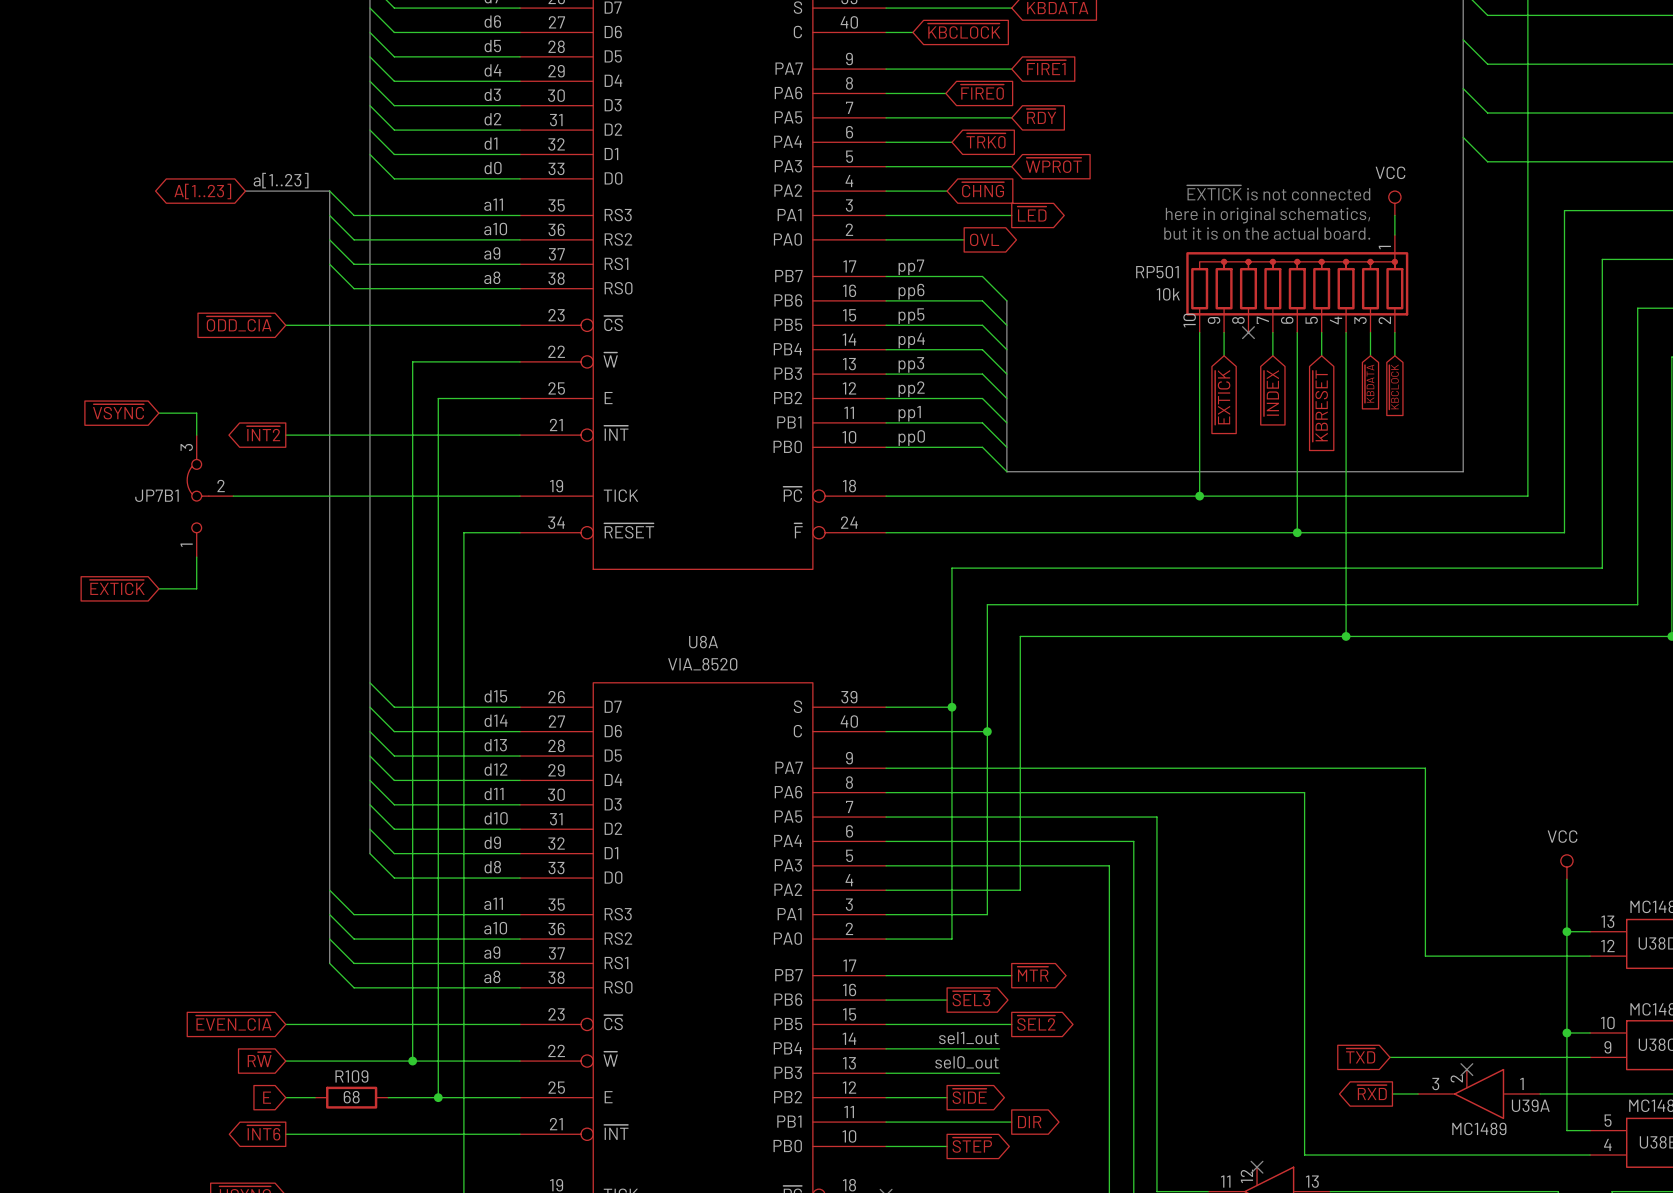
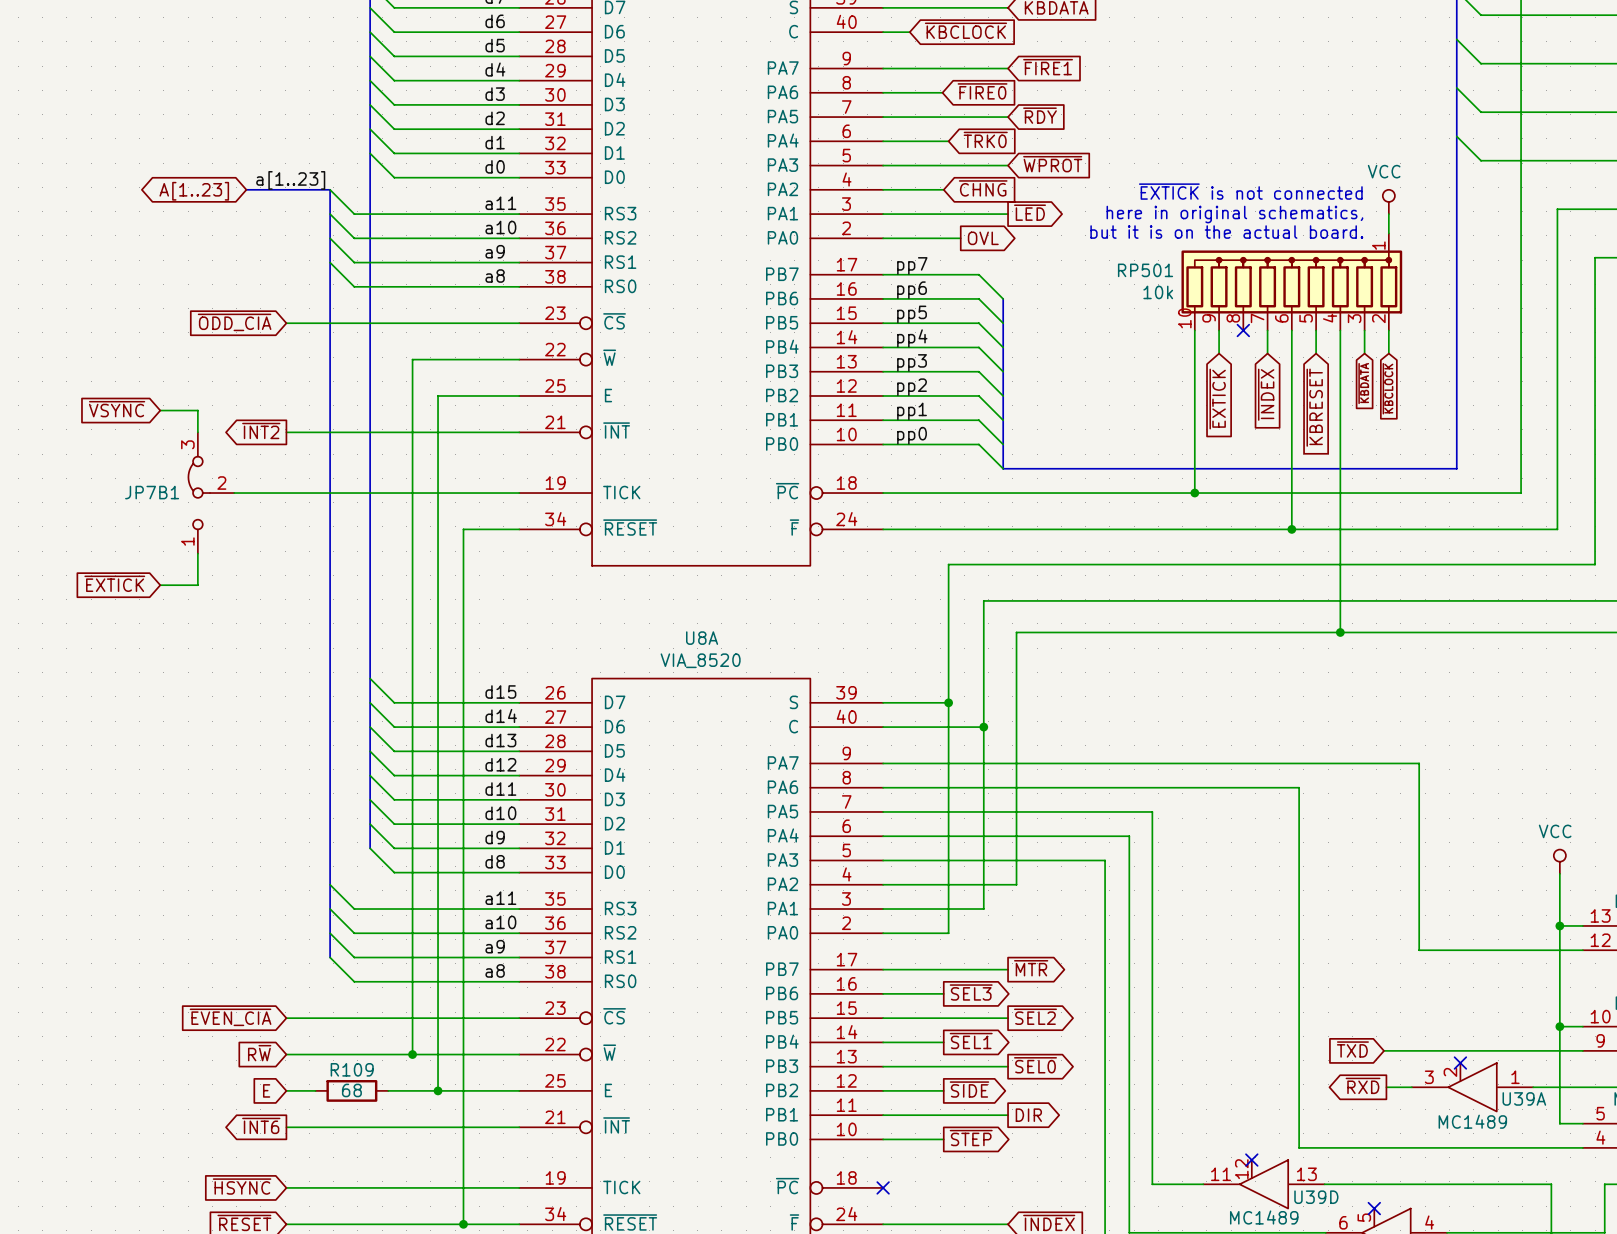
label: sel1_out (968, 1038) -> none
global label: none -> ~{SEL1} (971, 1041)
wire: (947, 1048) (999, 1048) -> none
label: sel0_out (966, 1062) -> none
global label: none -> ~{SEL0} (1035, 1065)
wire: none -> (995, 1066) (1008, 1066)

